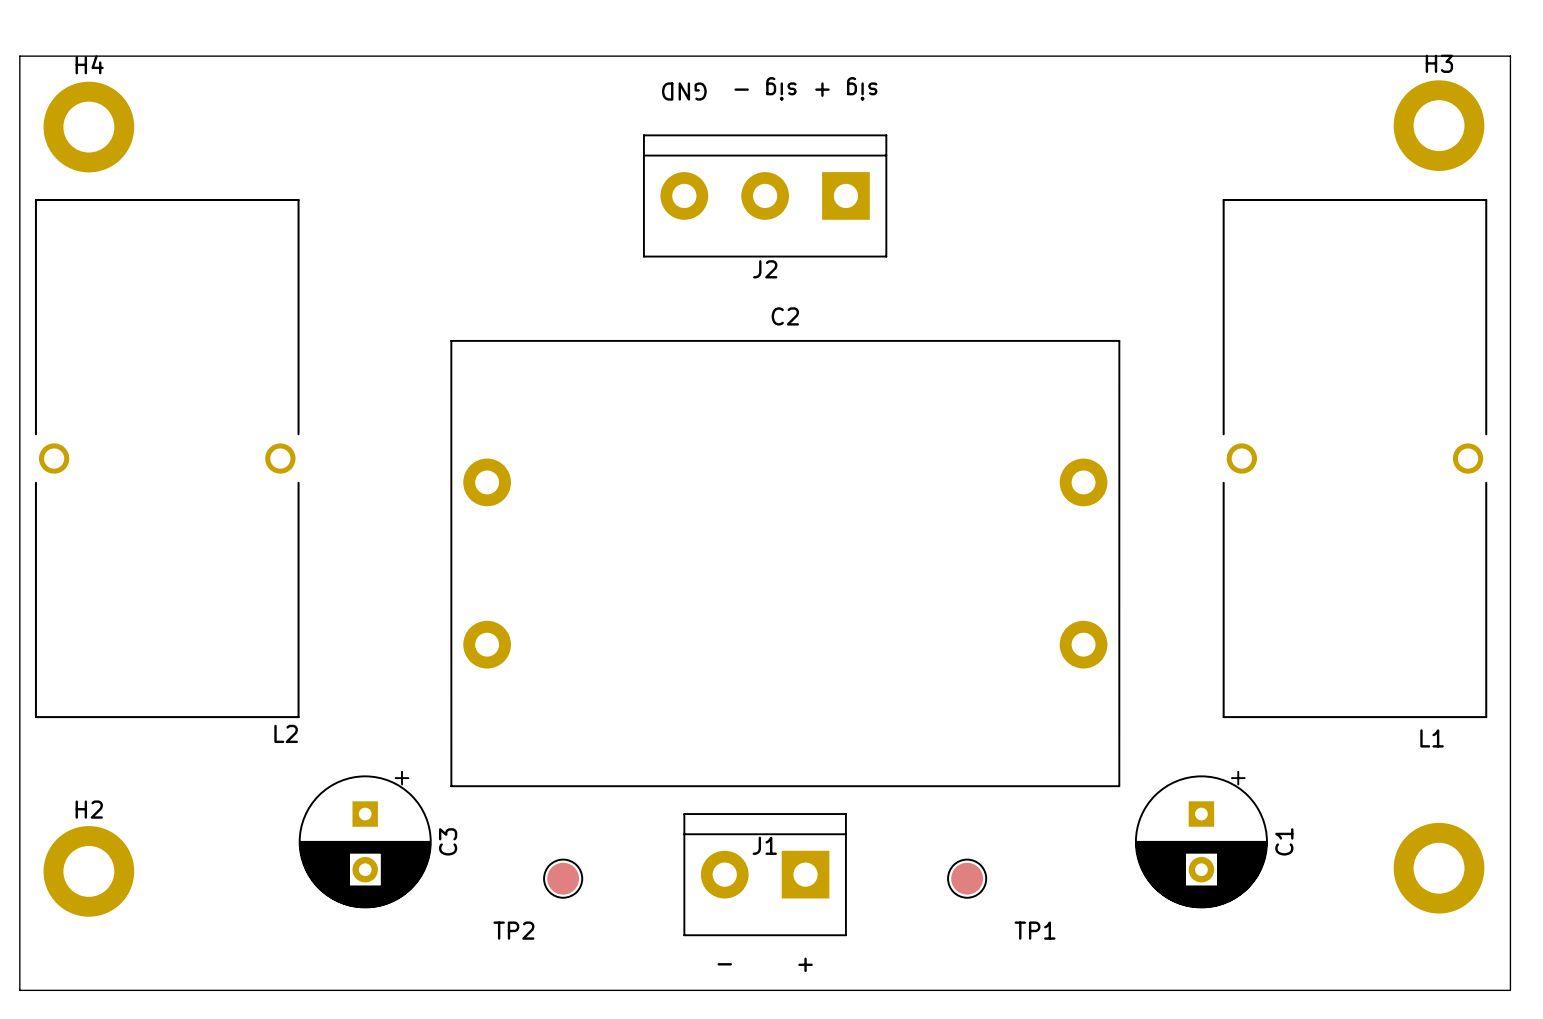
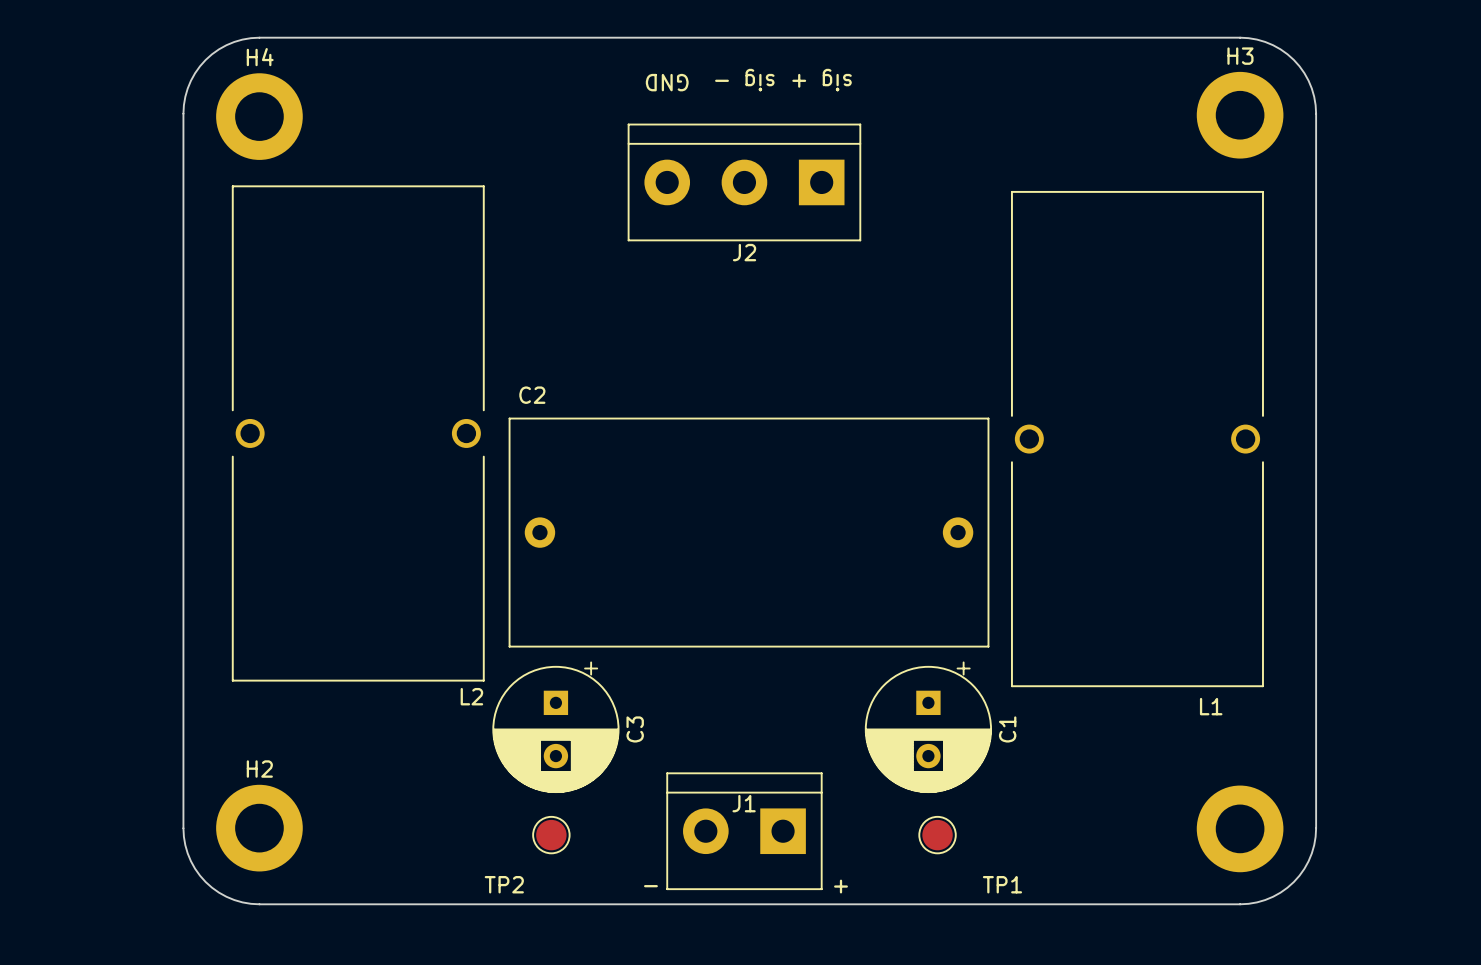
board edge: (19, 56) (19, 990) (1510, 990) (1510, 56) (19, 56) -> (259, 37) (234, 41) (219, 49) (205, 59) (195, 73) (187, 88) (183, 113) (183, 828) (185, 845) (190, 861) (200, 875) (212, 887) (234, 900) (259, 904) (1240, 904) (1257, 902) (1273, 896) (1287, 887) (1299, 875) (1311, 853) (1316, 828) (1316, 113) (1314, 96) (1308, 80) (1299, 66) (1287, 54) (1265, 41) (1240, 37) (259, 37)
H3 position: (1439, 125) -> (1240, 115)
H4 position: (88, 127) -> (259, 116)
C2 name position: C2 (785, 316) -> C2 (532, 395)
C2 footprint: [450, 339, 1121, 788] -> [508, 417, 990, 648]
L2 position: (167, 458) -> (358, 433)
L1 position: (1354, 458) -> (1137, 439)
C3 position: (365, 839) -> (555, 727)
C1 position: (1201, 839) -> (928, 727)
part position: (1439, 868) -> (1240, 828)
H2 position: (88, 871) -> (259, 828)
text position: _ (724, 964) -> _ (650, 886)
text position: + (805, 964) -> + (841, 886)

